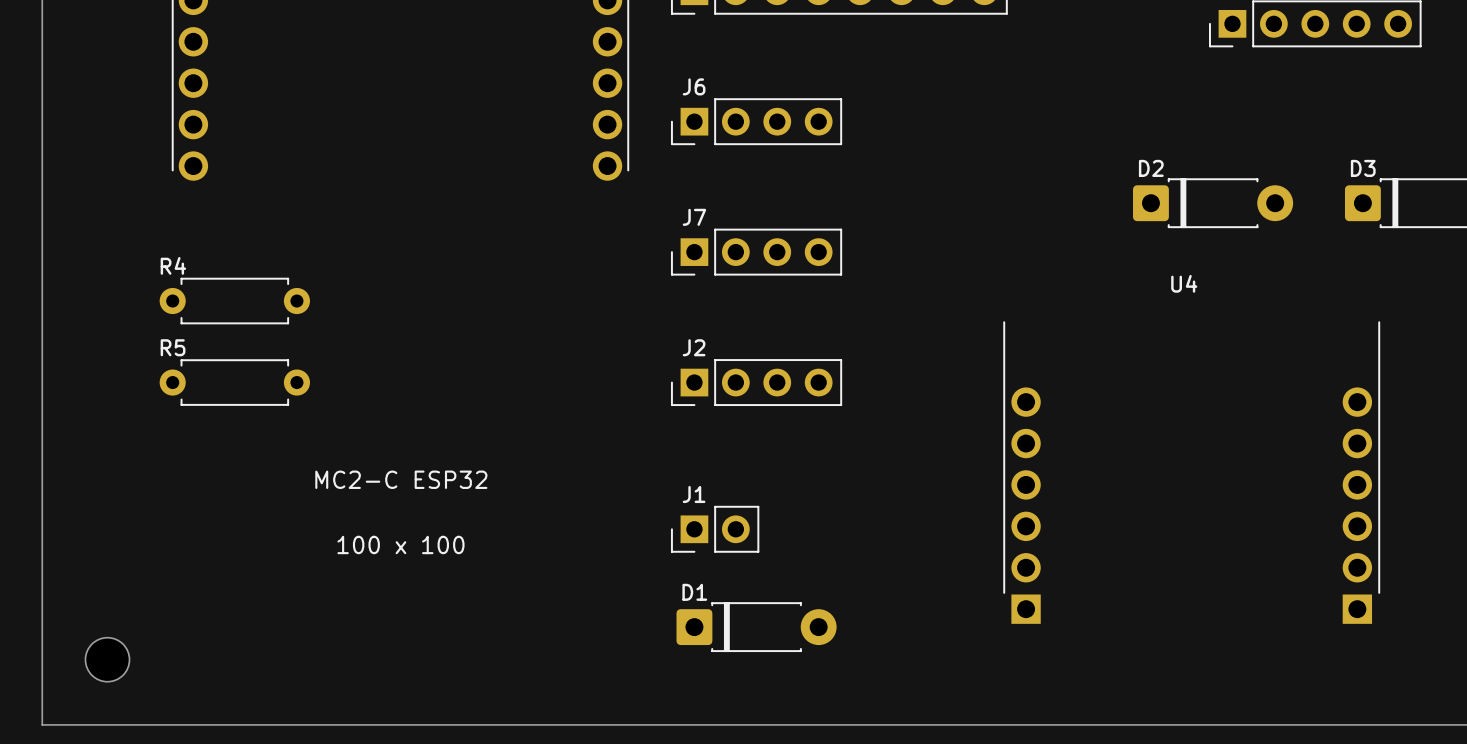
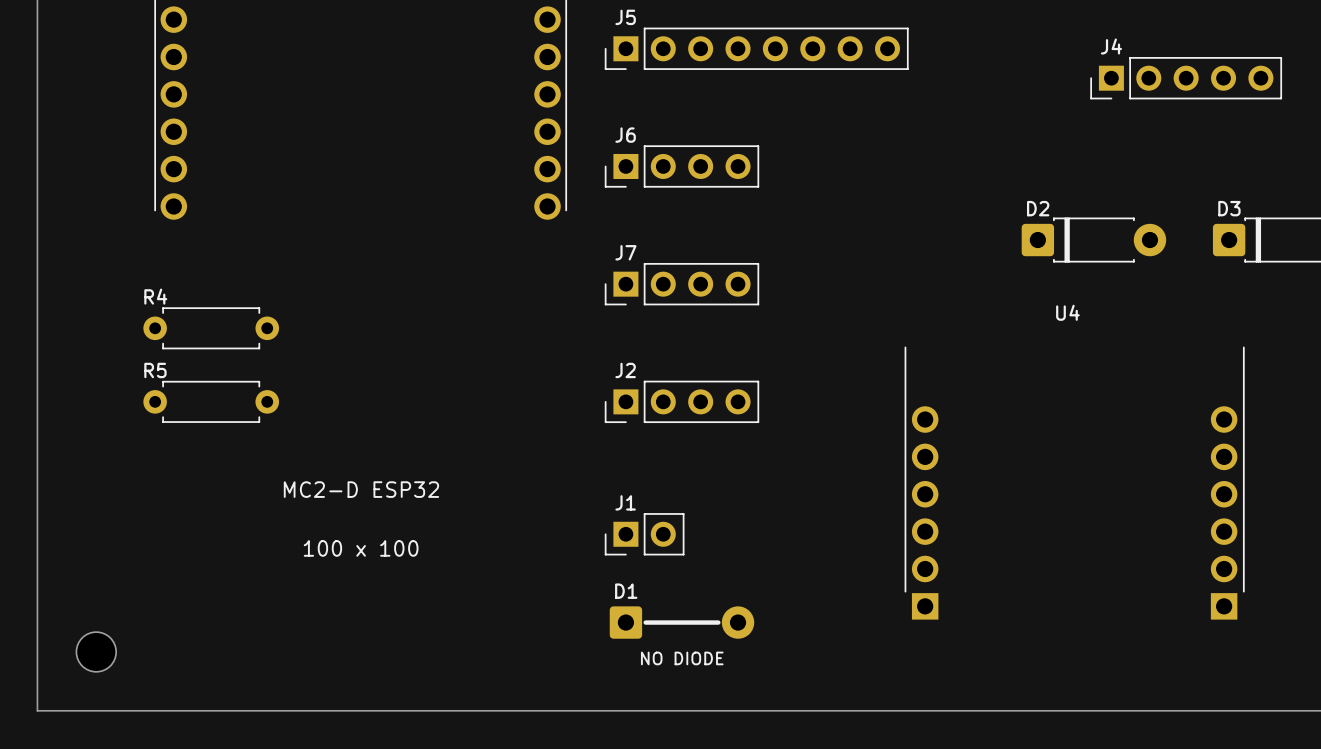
text: MC2-C ESP32 (401, 479) -> MC2-D ESP32 (361, 489)
D1 footprint: [676, 602, 837, 653] -> [609, 606, 755, 639]

